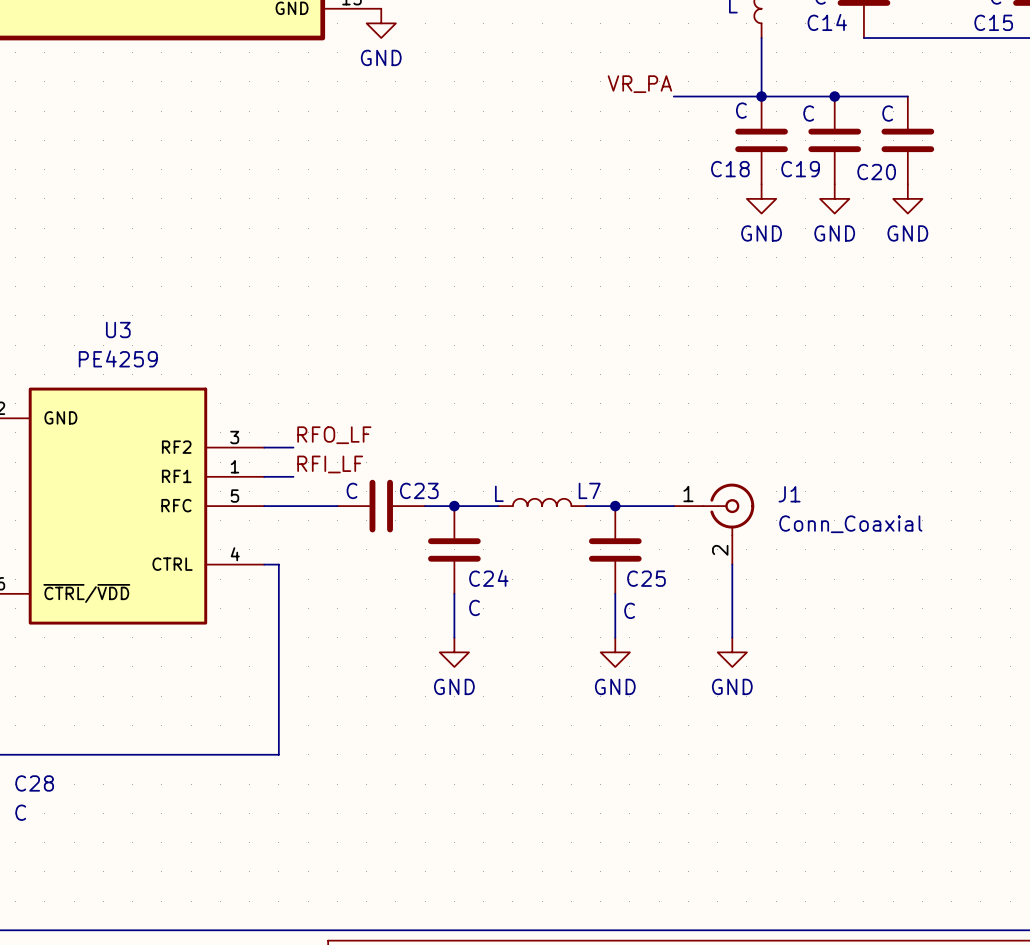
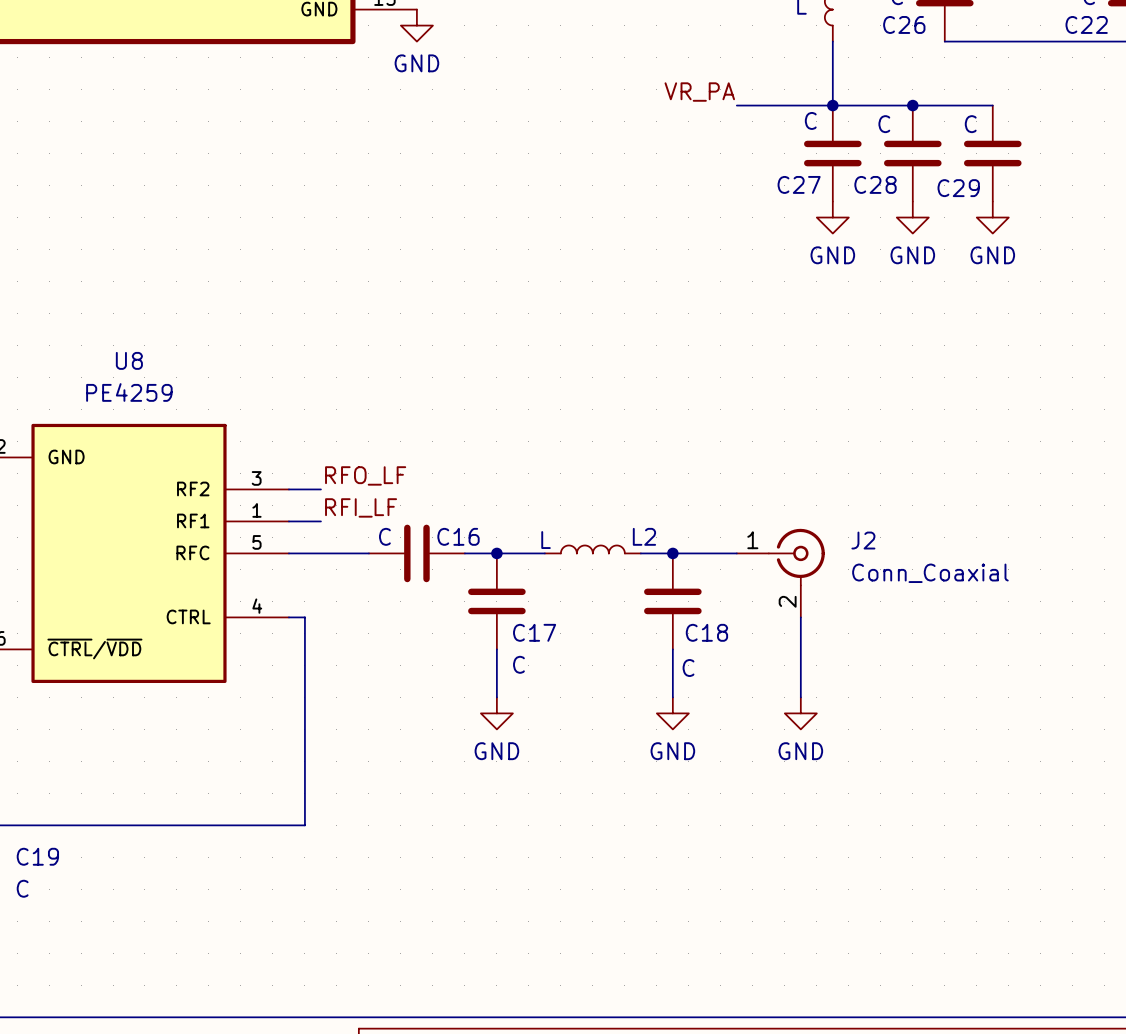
C14 name: C14 (827, 22) -> C26 (904, 24)
C15 name: C15 (993, 22) -> C22 (1086, 24)
C18 name: C18 (730, 169) -> C27 (799, 184)
C19 name: C19 (800, 169) -> C28 (875, 184)
C20 name: C20 (876, 172) -> C29 (958, 188)
U3 name: U3 (118, 330) -> U8 (129, 360)
C23 name: C23 (419, 490) -> C16 (458, 536)
L7 name: L7 (589, 490) -> L2 (644, 536)
J1 name: J1 (789, 494) -> J2 (863, 540)
C24 name: C24 (488, 578) -> C17 (534, 632)
C25 name: C25 (646, 578) -> C18 (706, 632)
C28 name: C28 (34, 783) -> C19 (37, 856)

